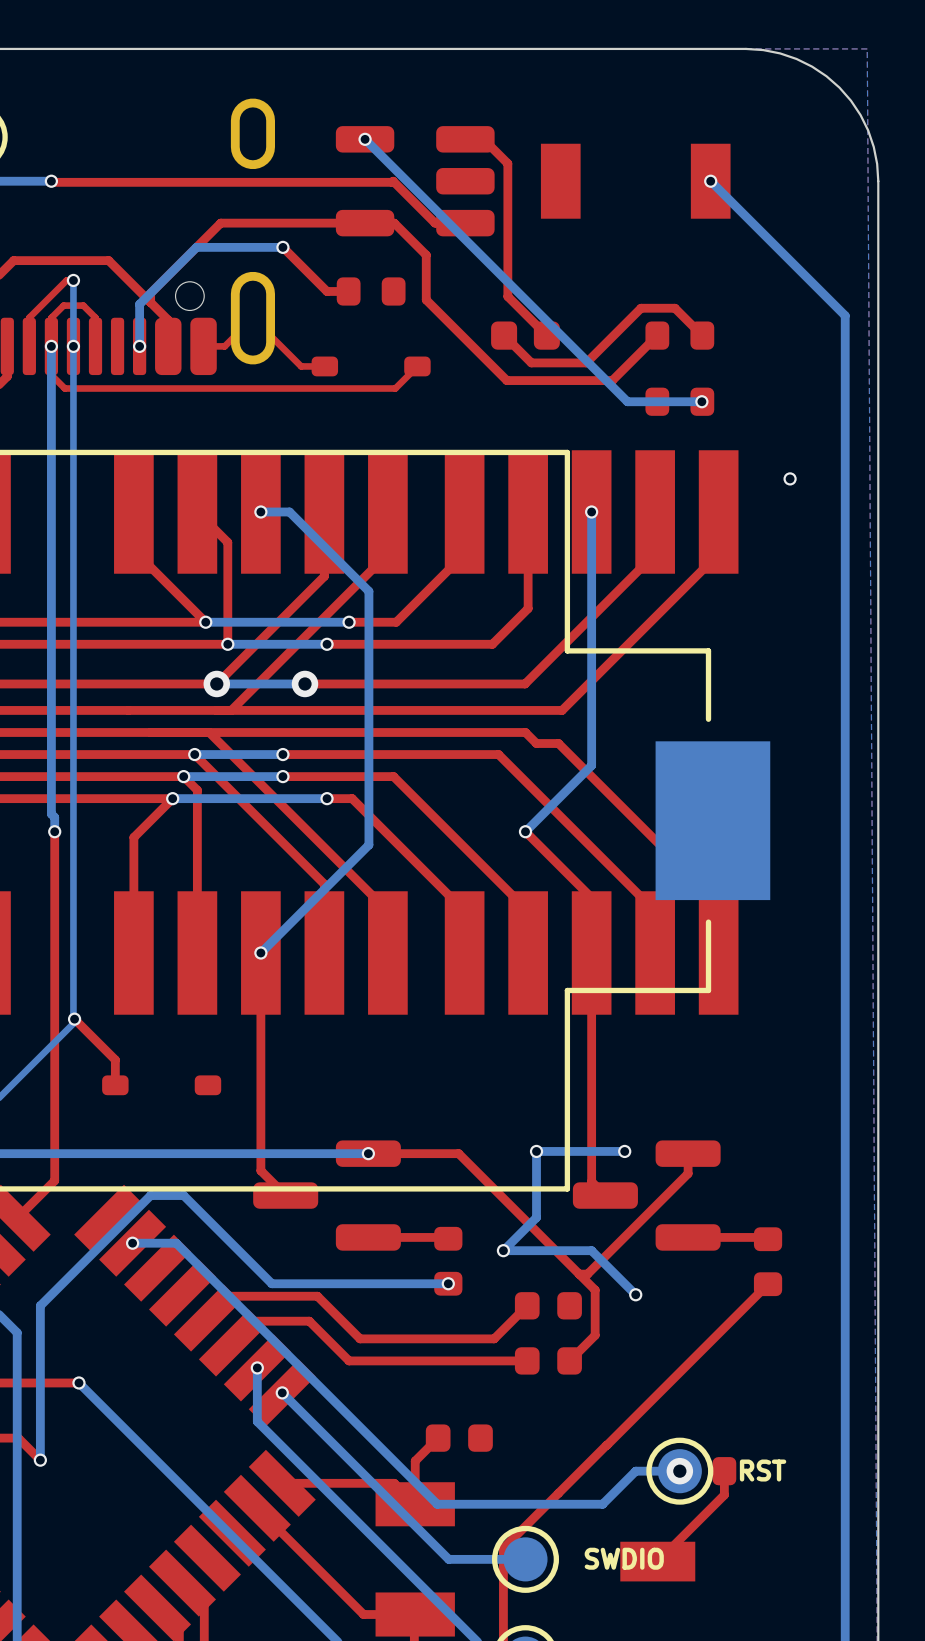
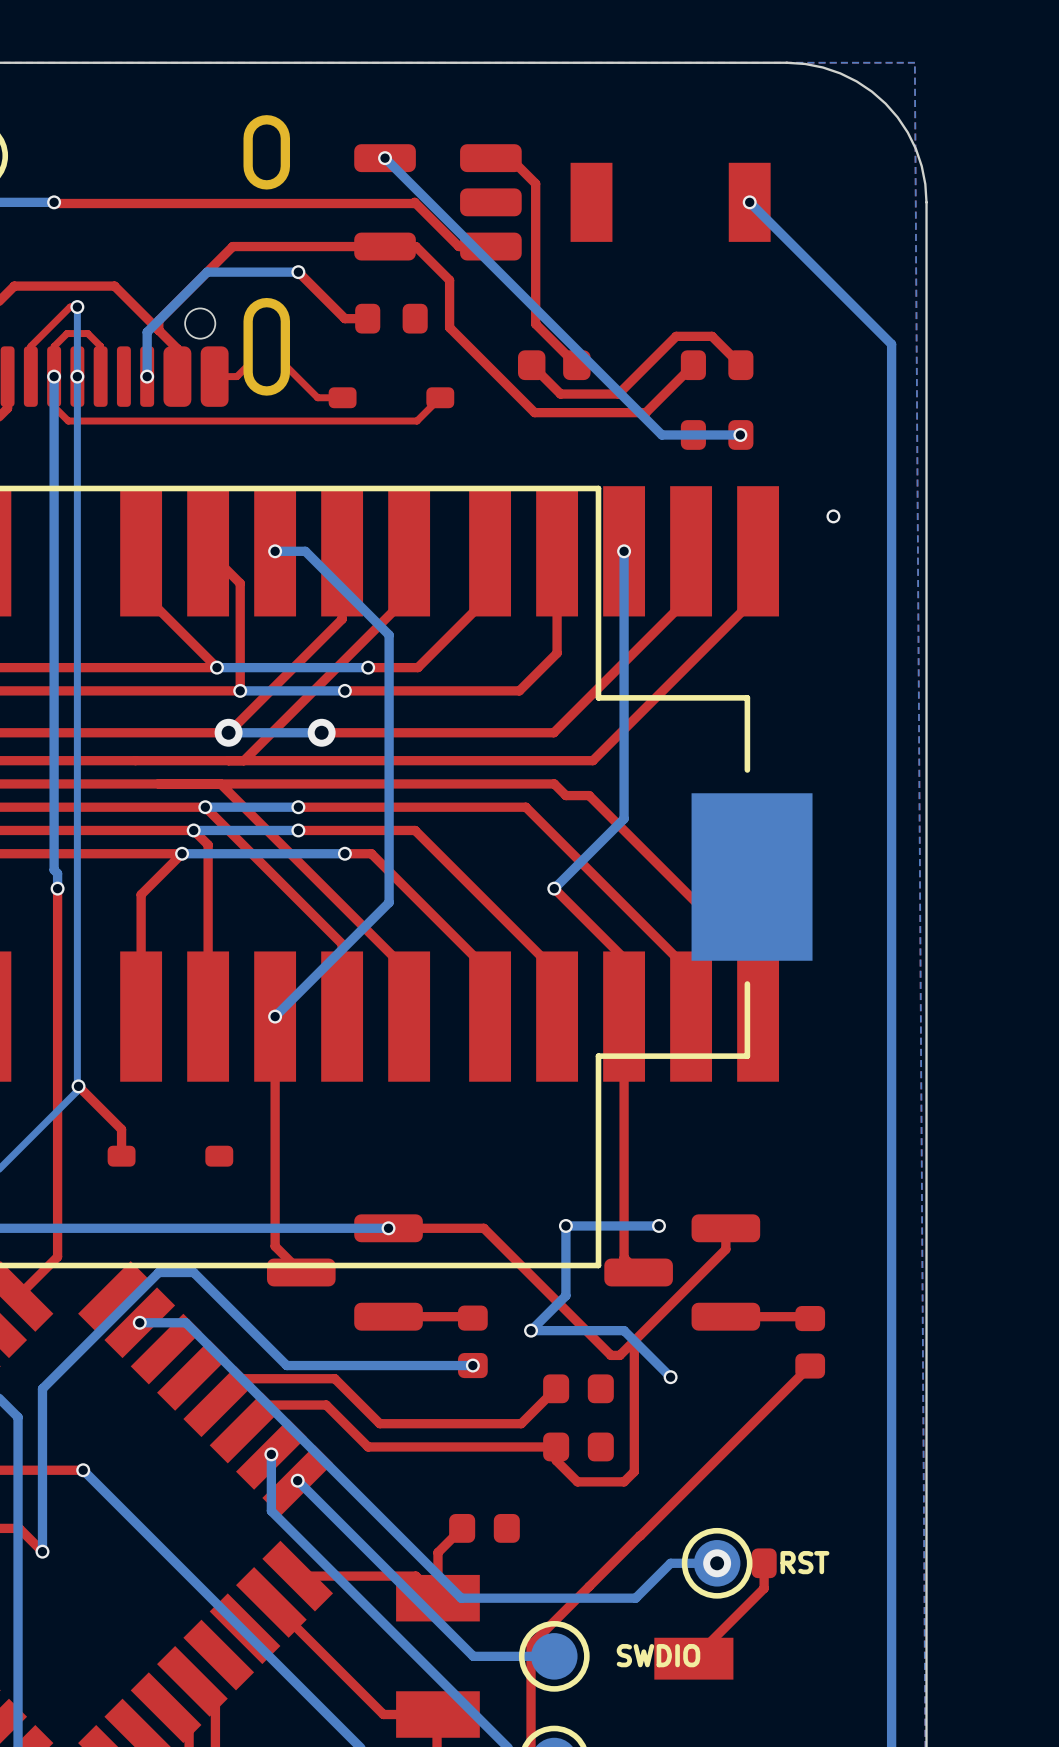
top track: none -> (634, 1340) (634, 1471) (624, 1481) (577, 1481) (556, 1460) (556, 1446)
top track: (579, 1274) (595, 1290) (595, 1335) (569, 1360) -> none

